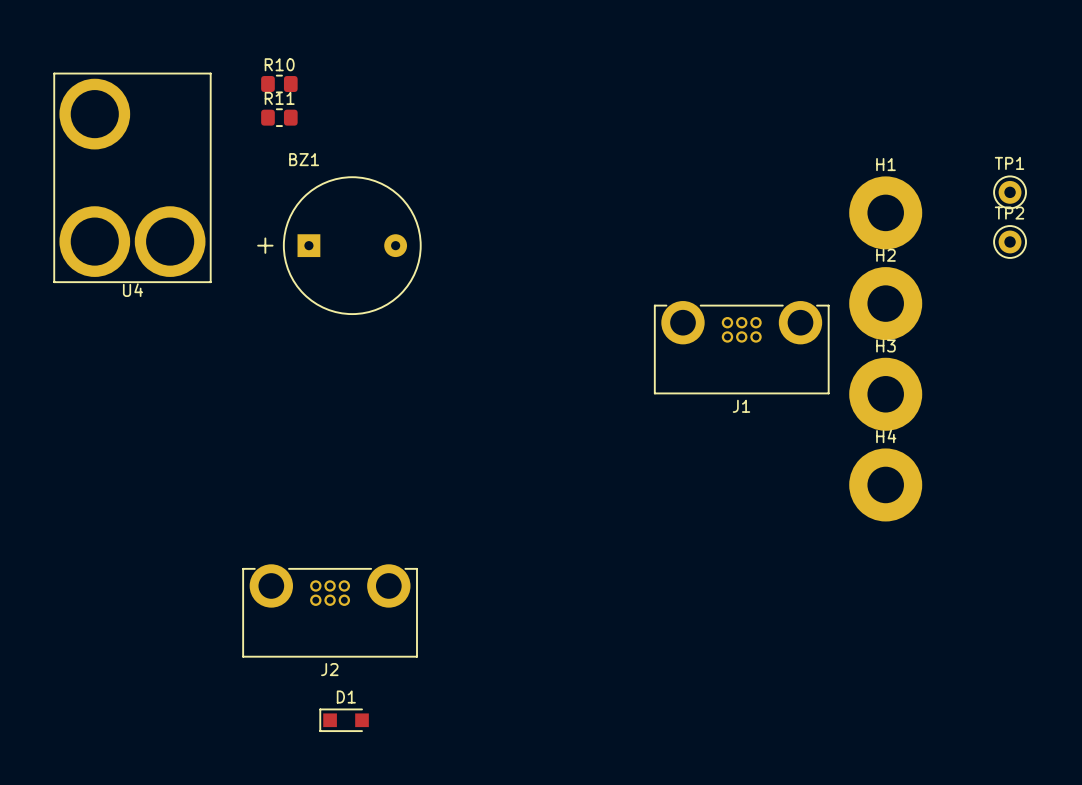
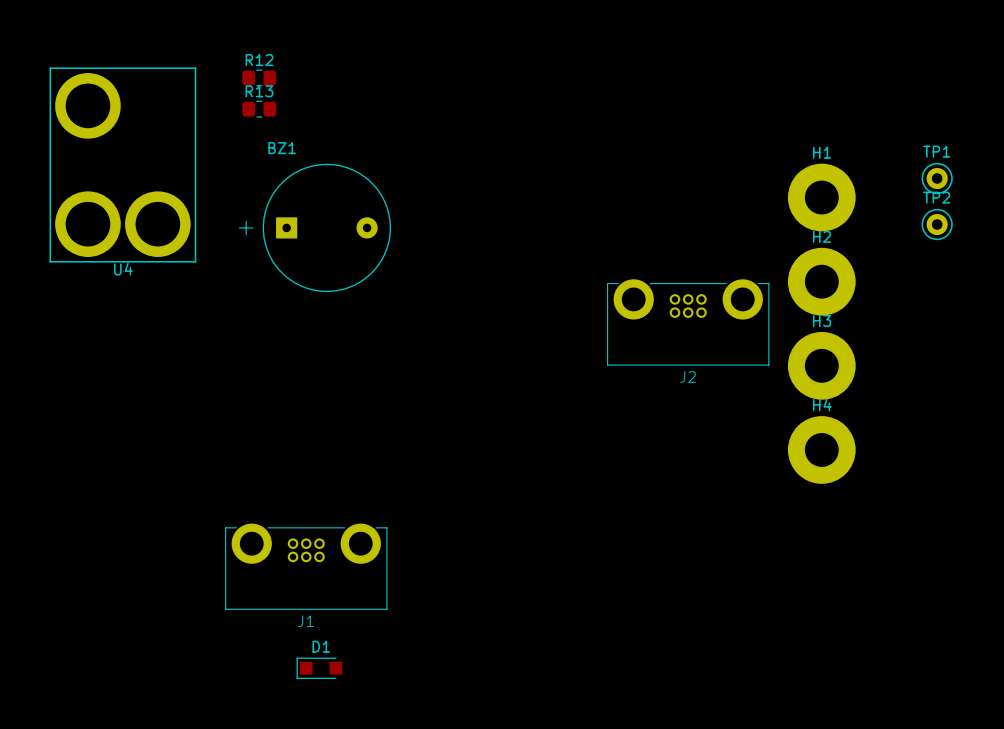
R10 name: R10 (279, 64) -> R12 (259, 60)
R11 name: R11 (279, 98) -> R13 (259, 91)
J1 name: J1 (741, 406) -> J2 (687, 376)
J2 name: J2 (329, 669) -> J1 (306, 621)

